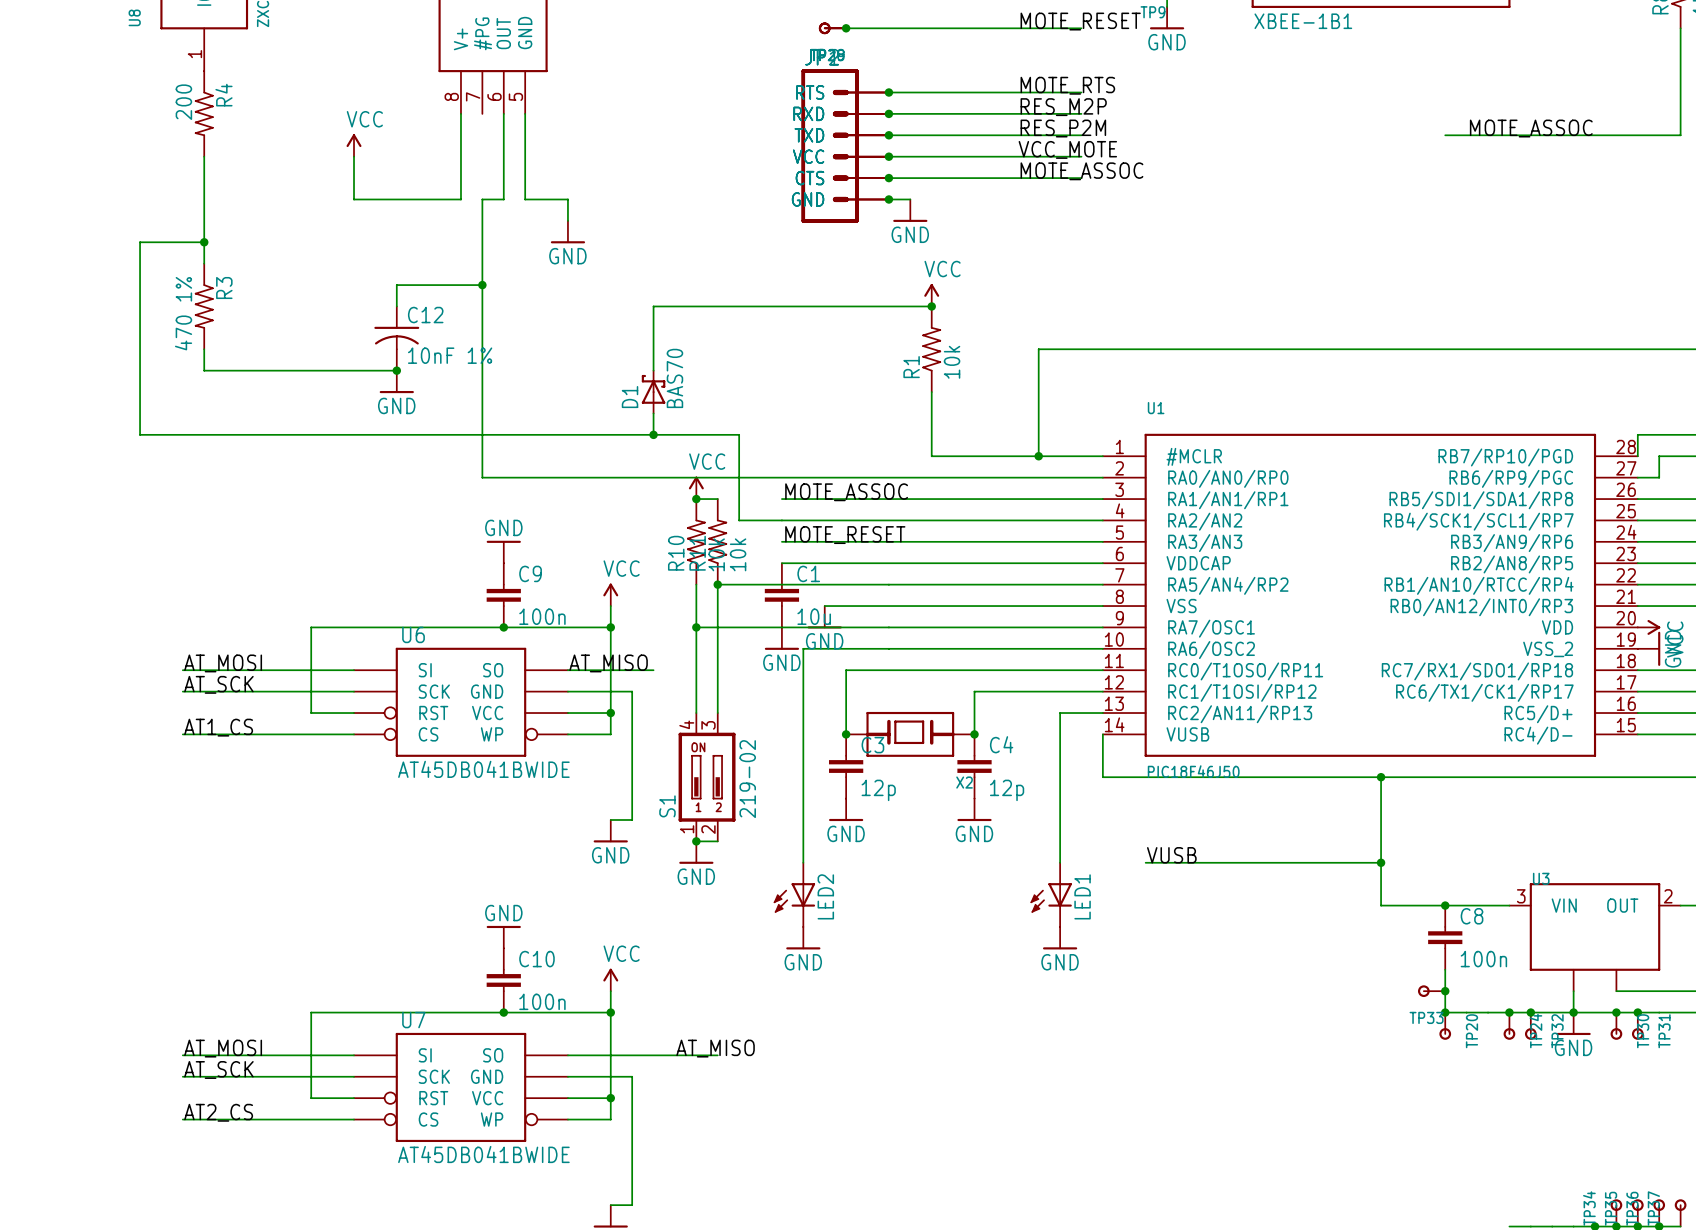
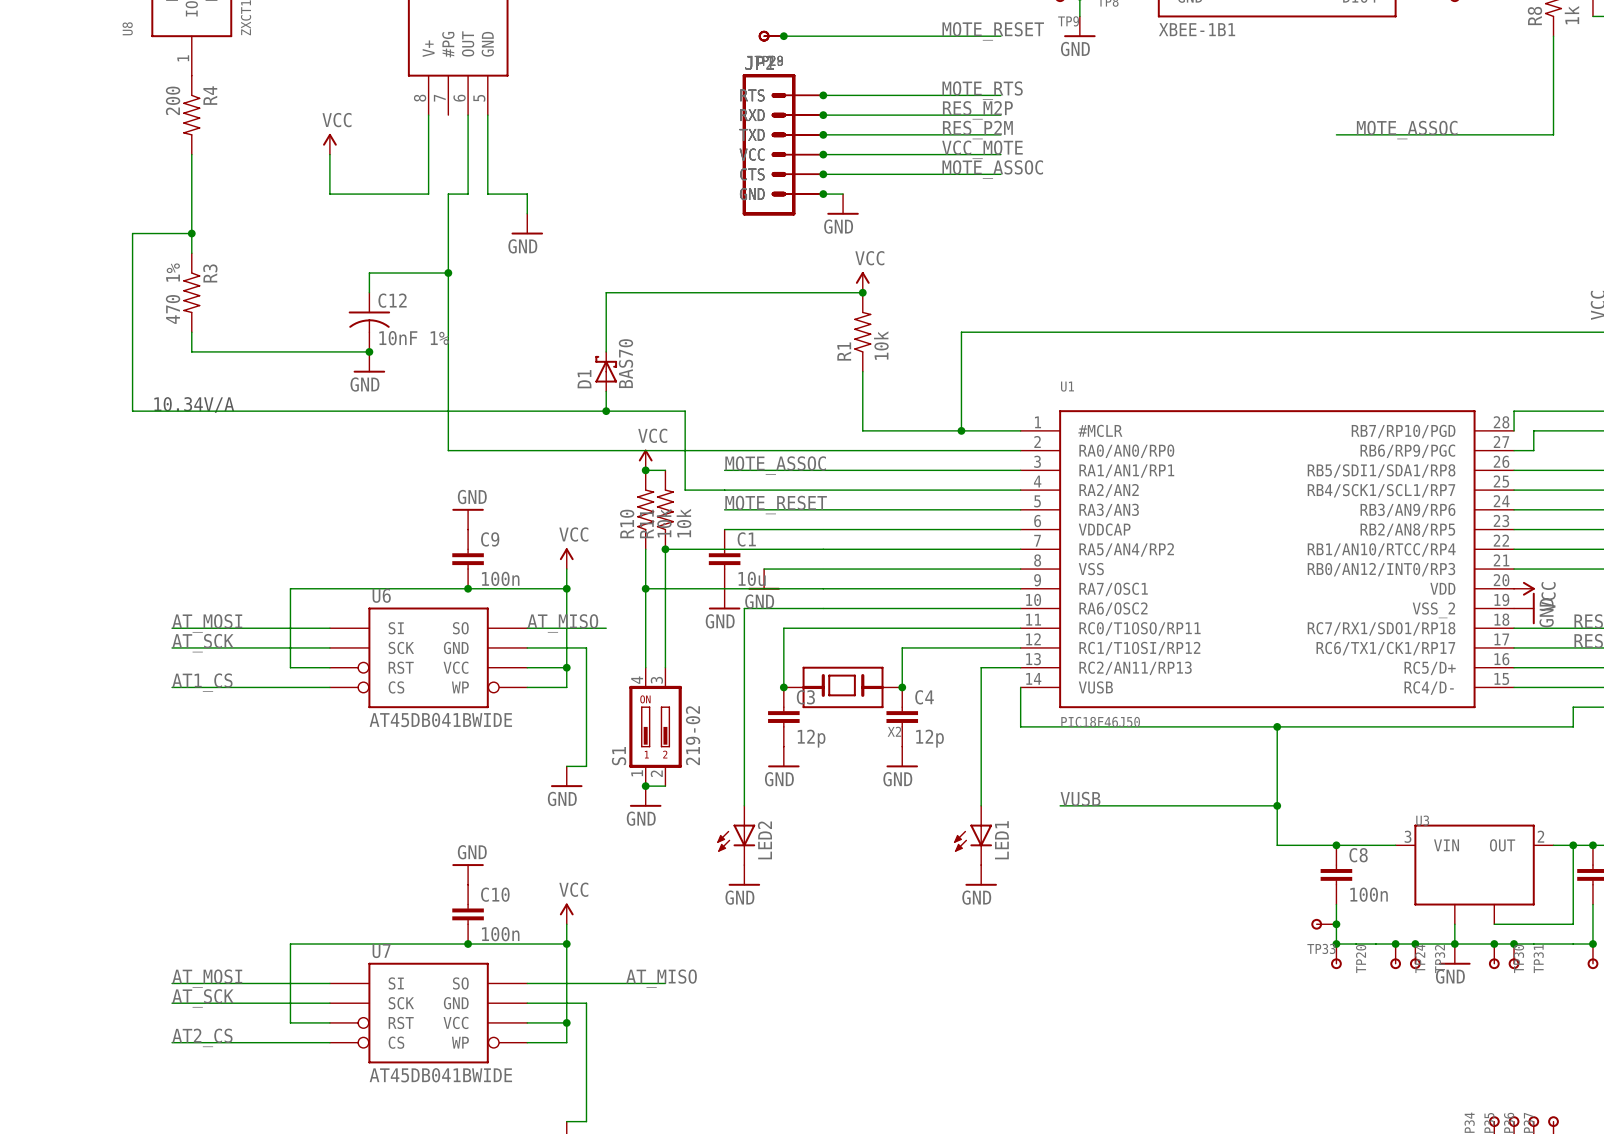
text: none -> 10.34V/A (194, 404)

